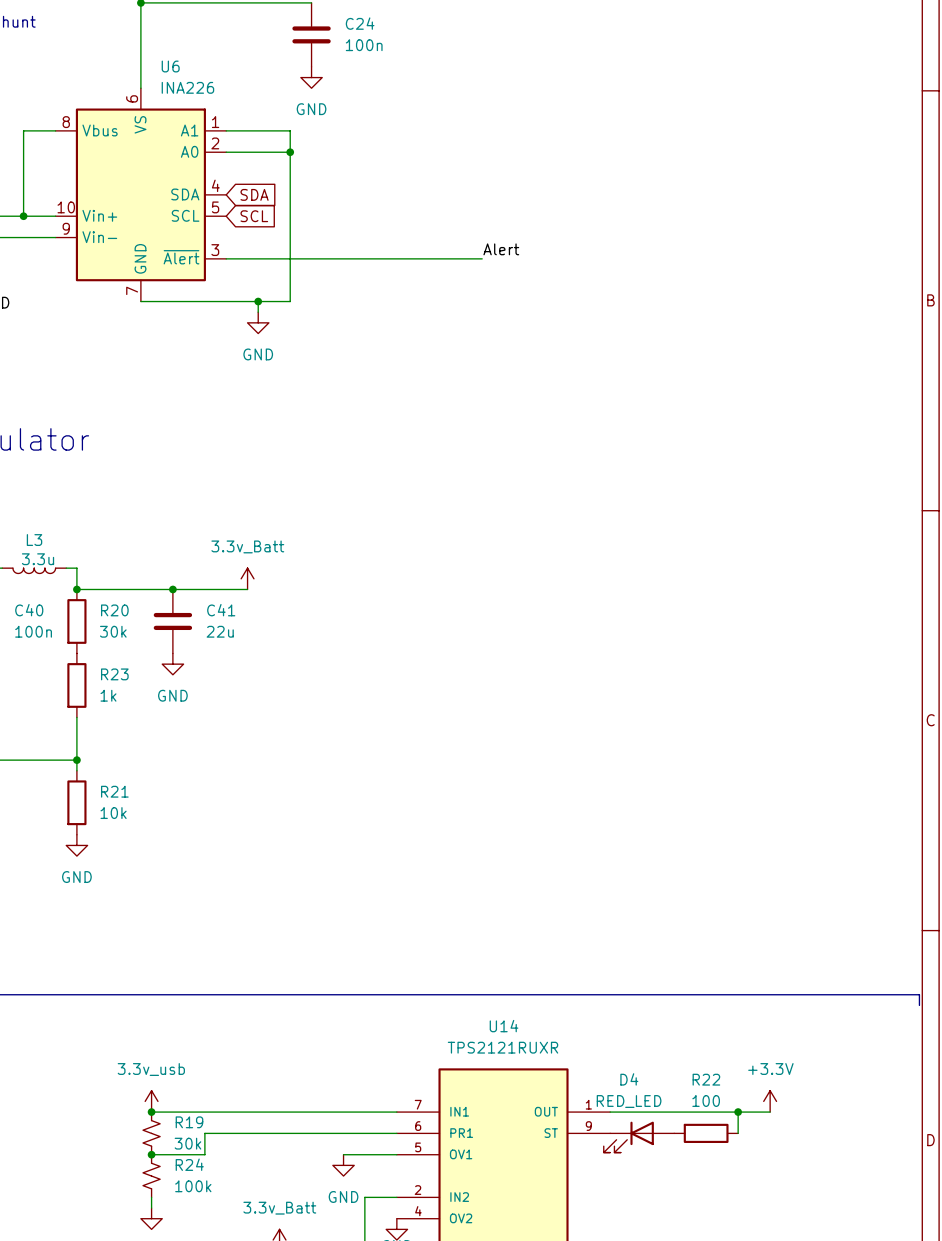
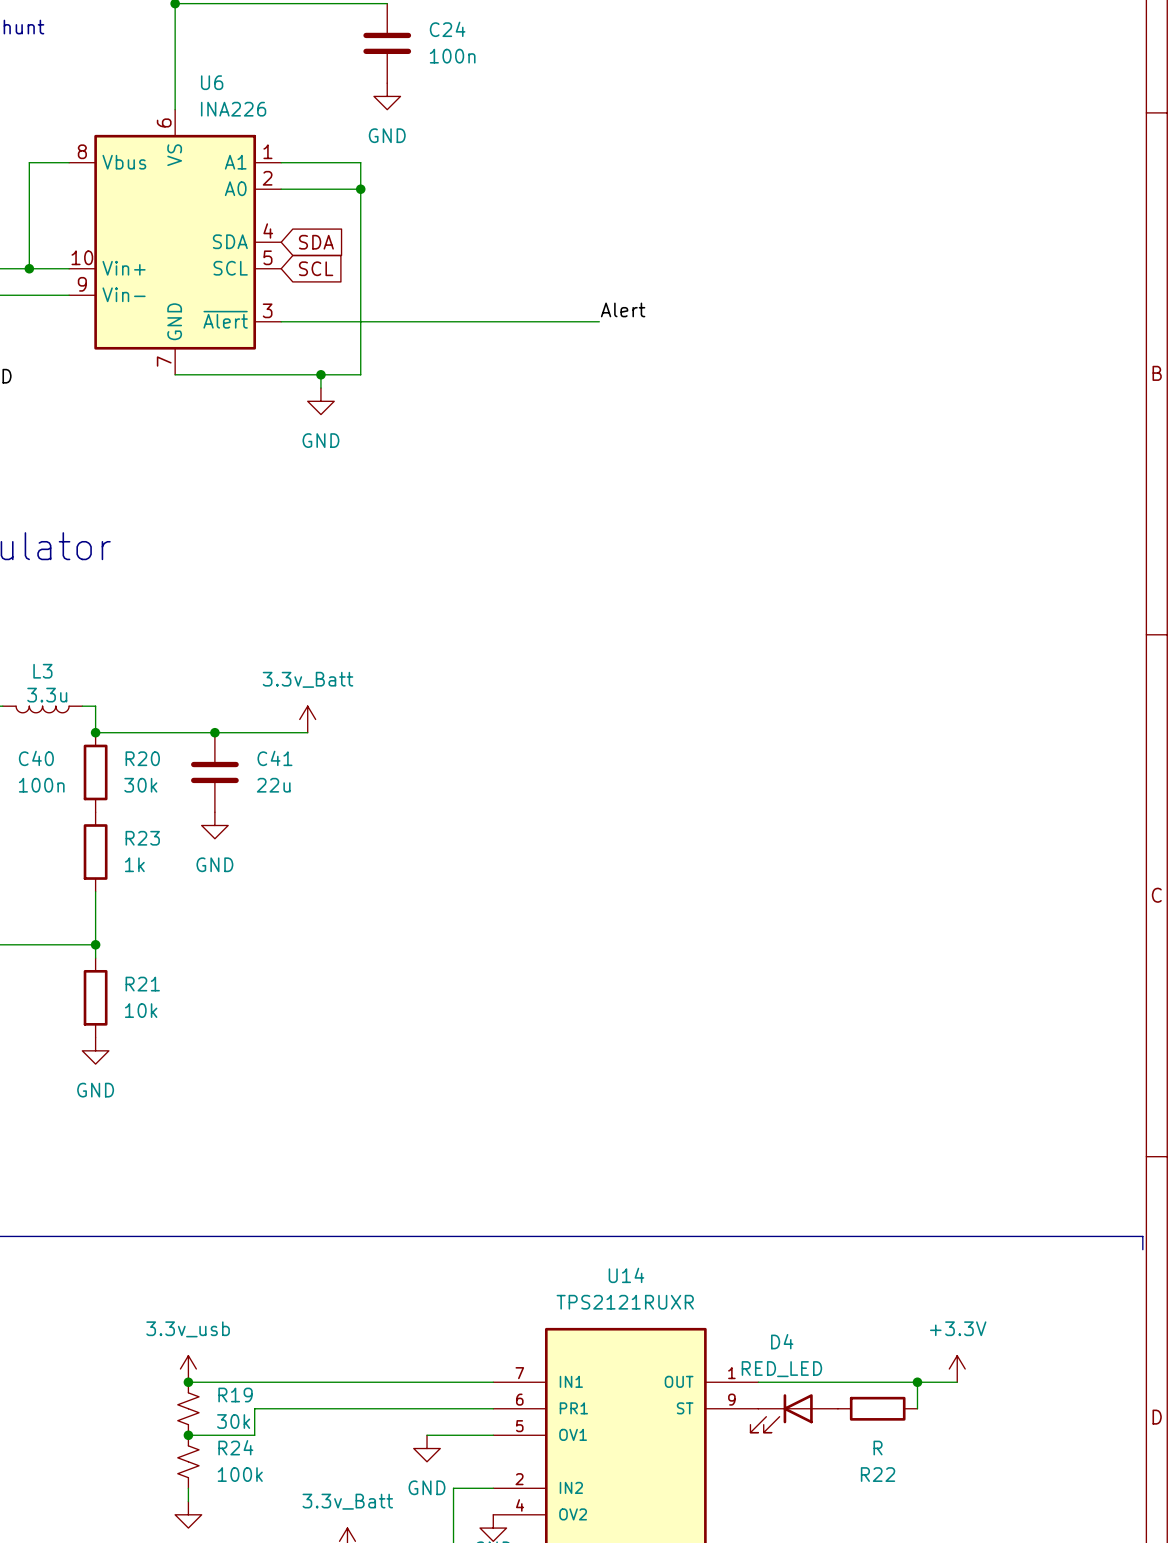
R22 name position: R22 (706, 1079) -> R22 (878, 1474)
R22 value: 100 (706, 1100) -> R (878, 1448)

